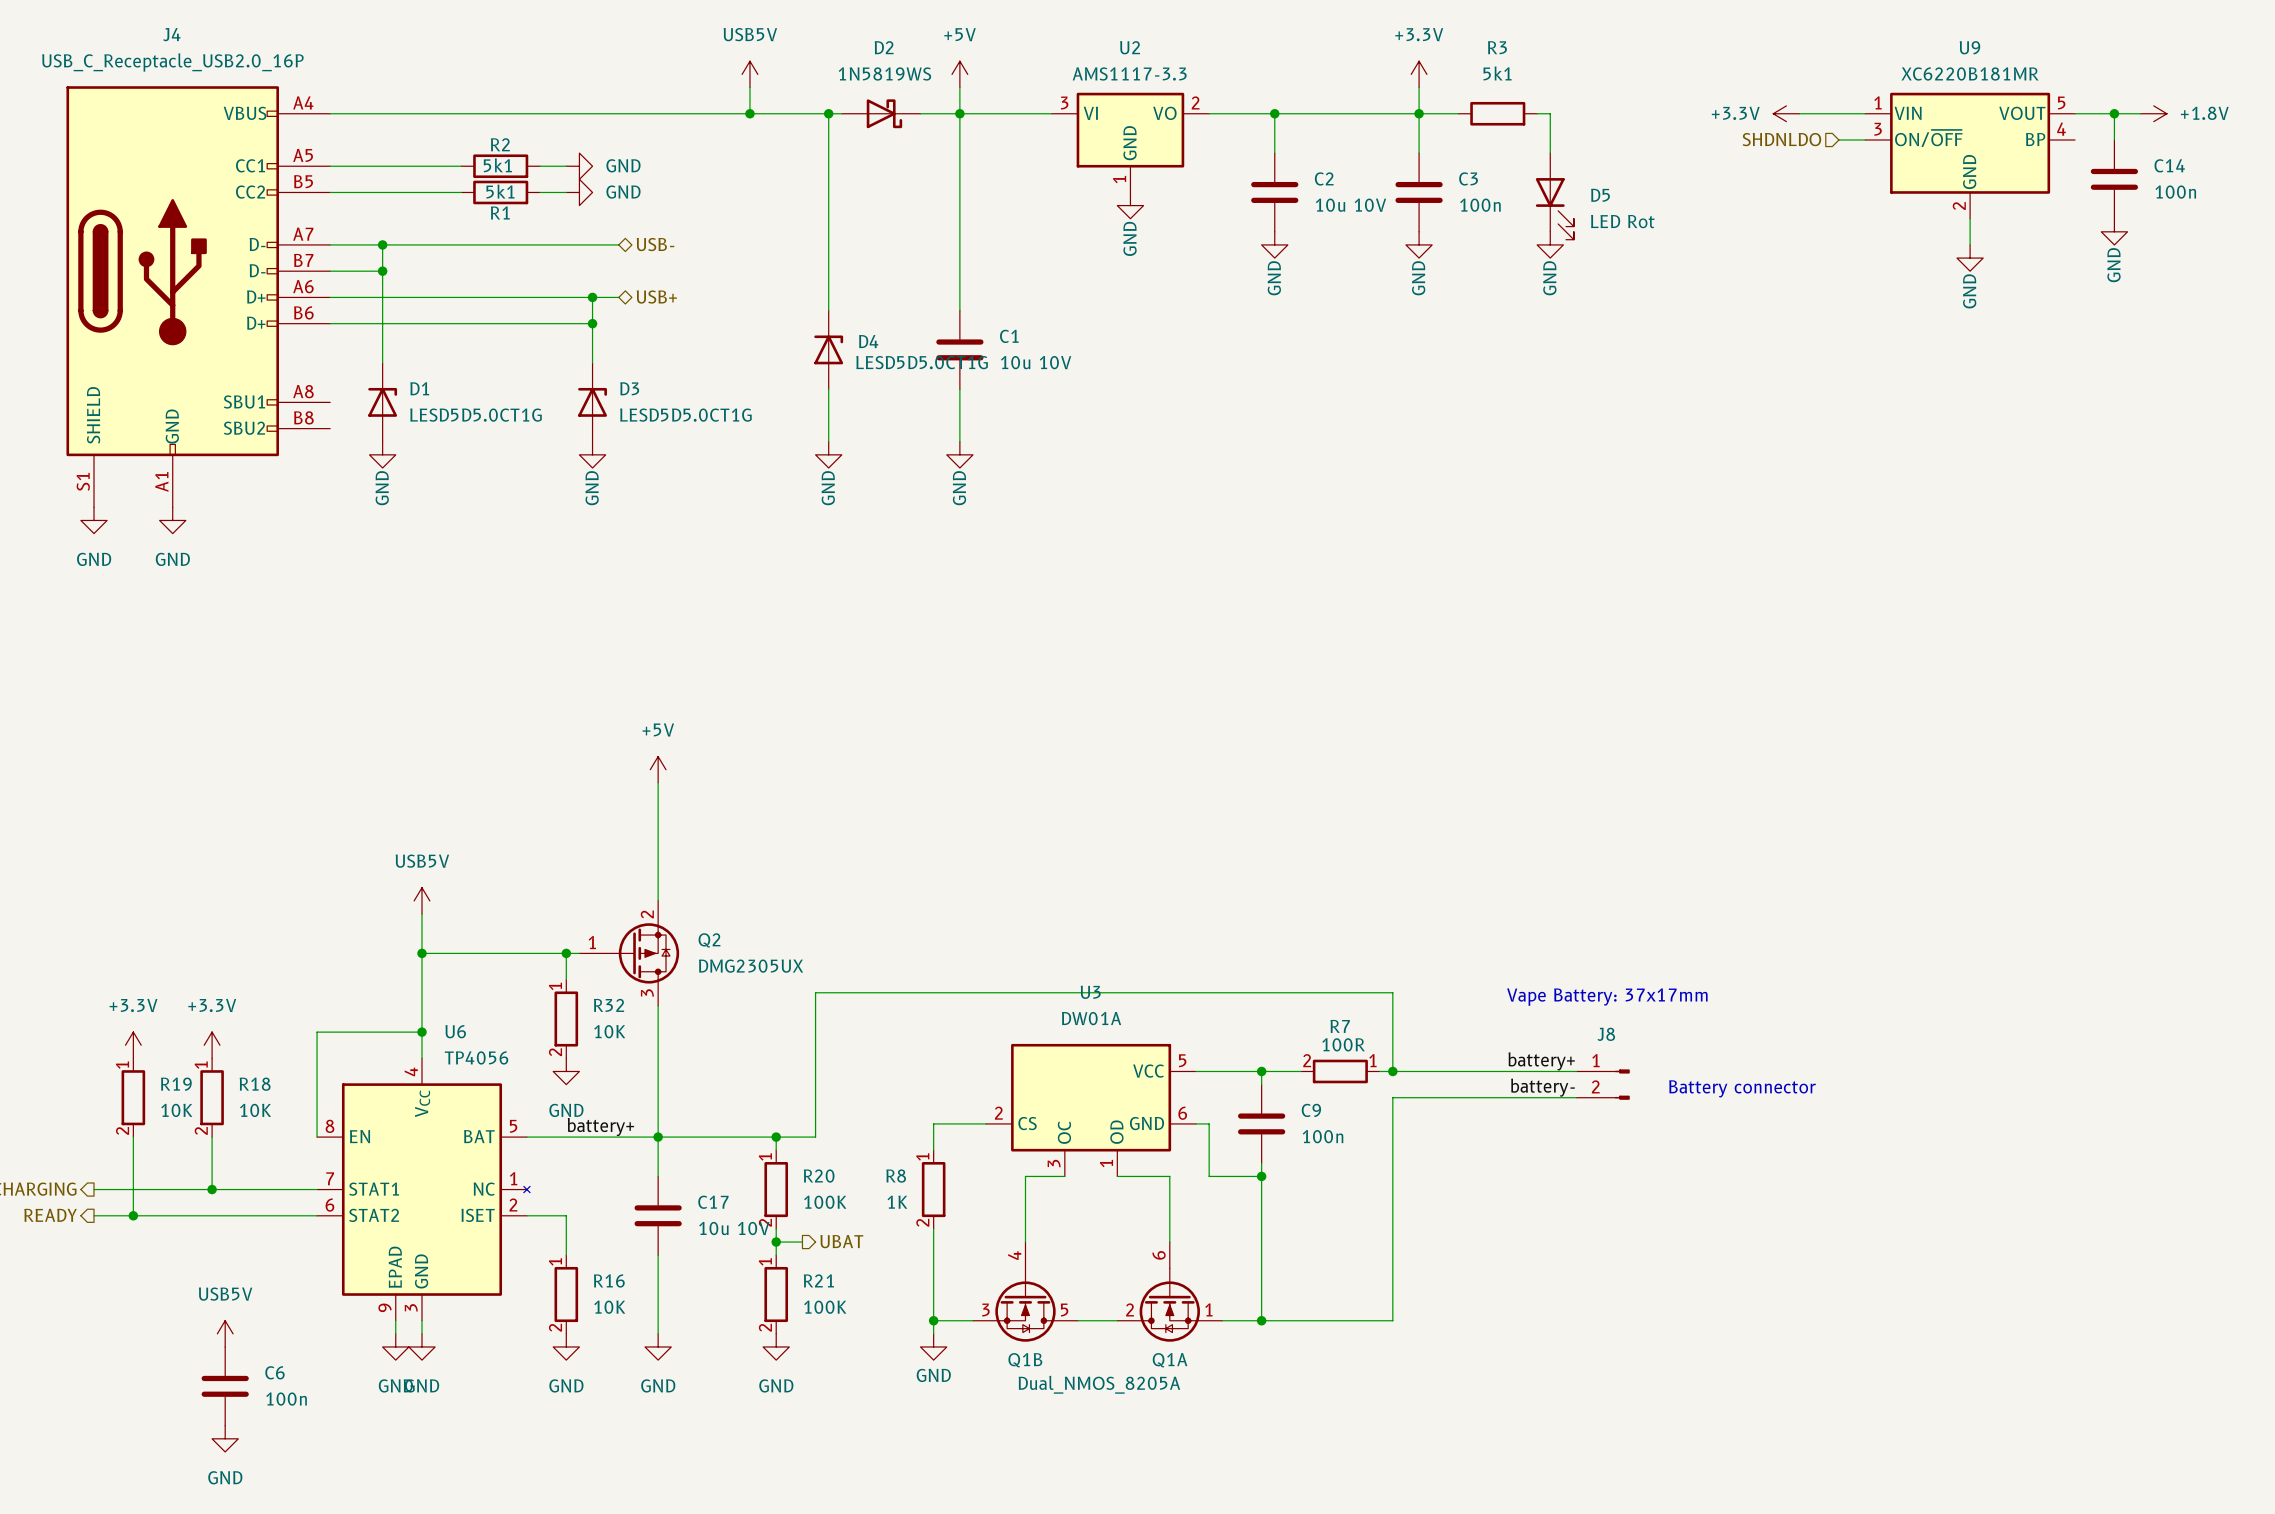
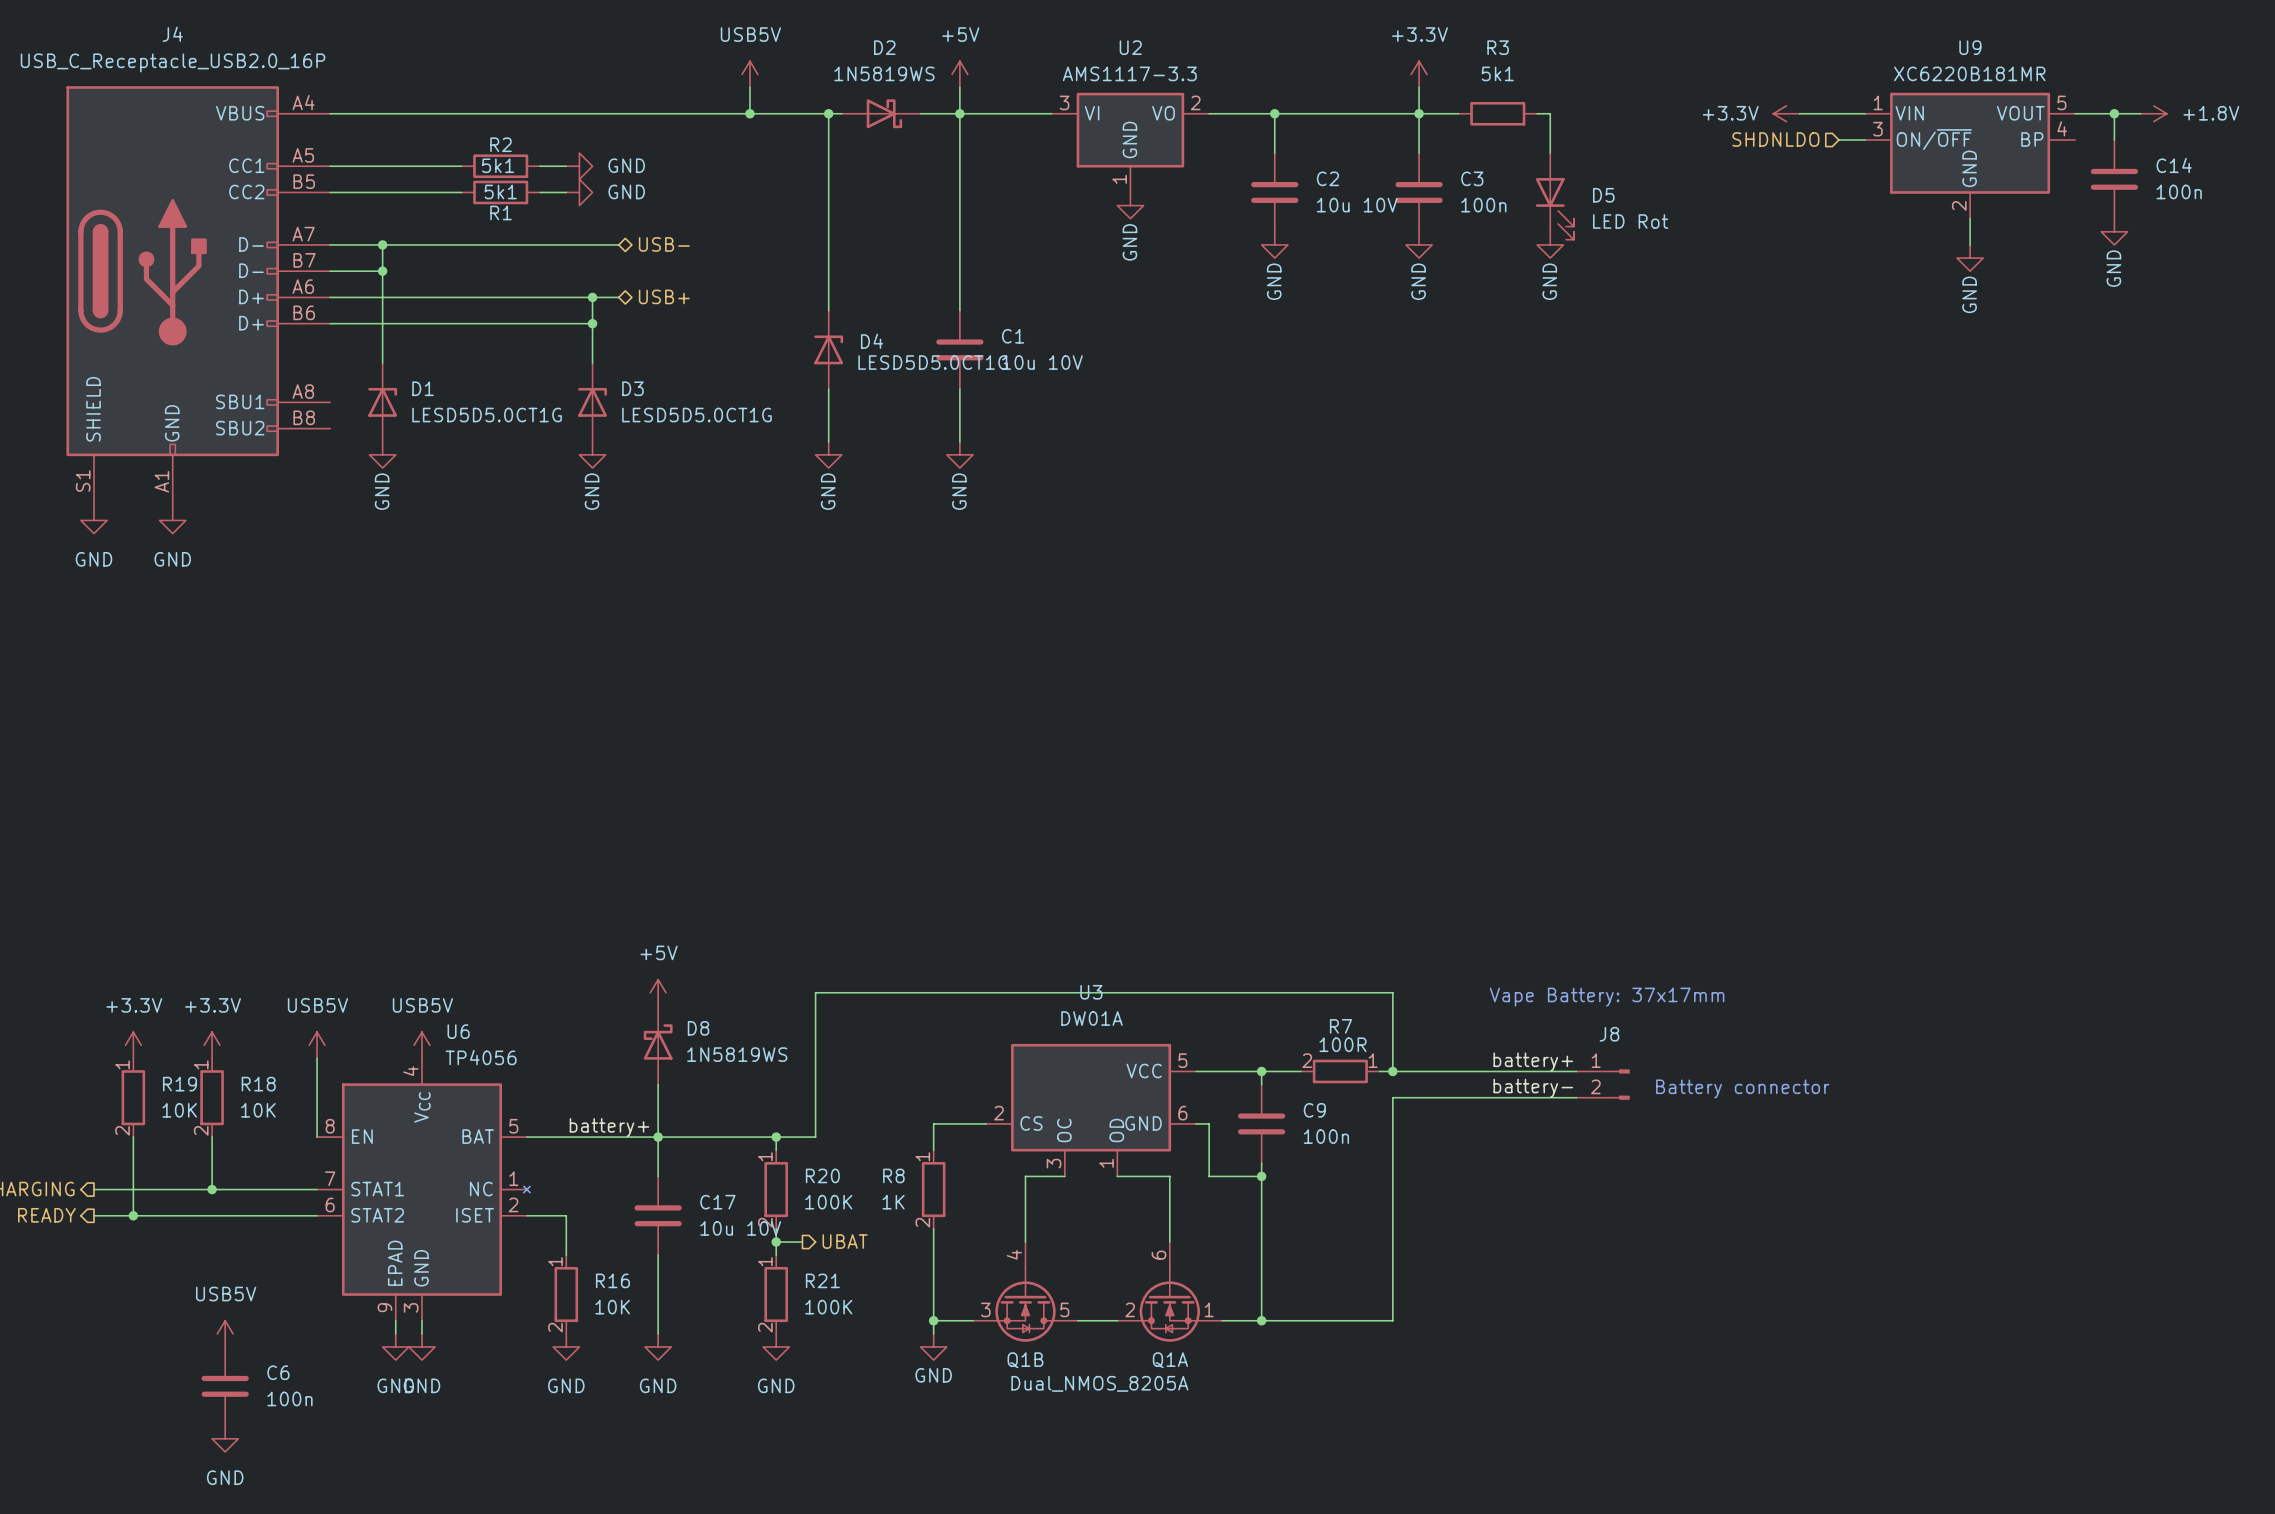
power symbol position: +5V (658, 769) -> +5V (658, 992)
wire: (658, 782) (658, 900) -> none
power symbol: USB5V (421, 900) -> none
wire: (421, 914) (421, 1058) -> none
wire: (421, 953) (579, 953) -> none
junction: (421, 953) -> none
wire: (566, 953) (566, 979) -> none
junction: (566, 953) -> none
Q2: DMG2305UX (629, 953) -> none
R32: 10K (566, 1019) -> none
wire: (421, 1032) (317, 1032) (317, 1058) -> none
junction: (421, 1032) -> none
power symbol: none -> USB5V (317, 1045)
power symbol: none -> USB5V (421, 1045)
D8: none -> 1N5819WS (658, 1045)
power symbol: GND (566, 1071) -> none

